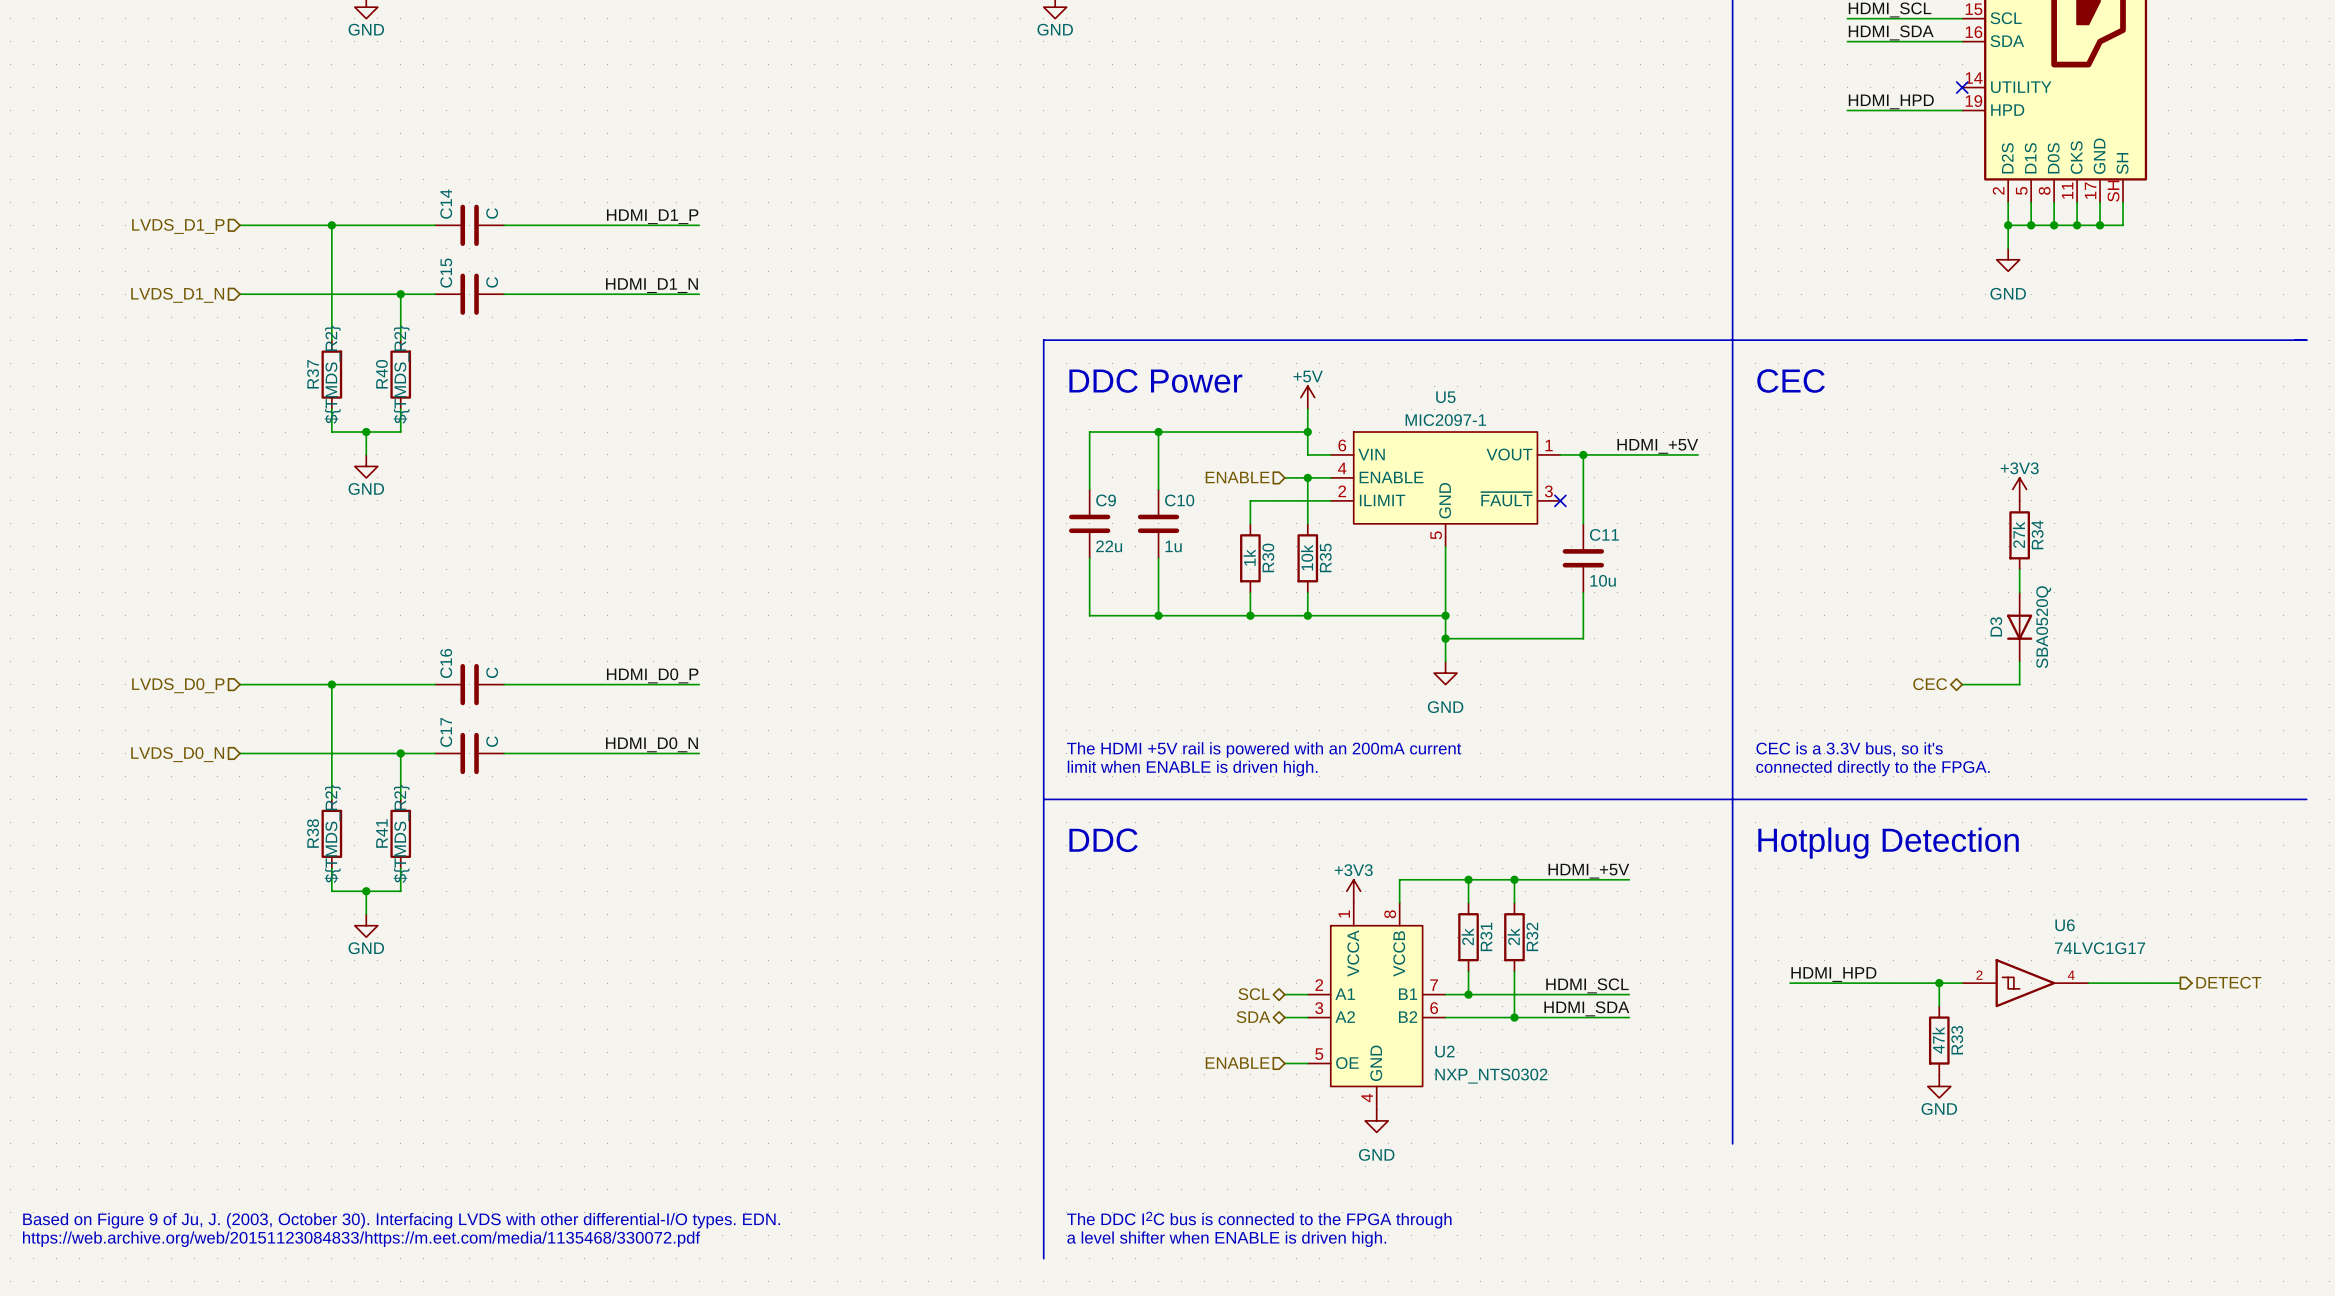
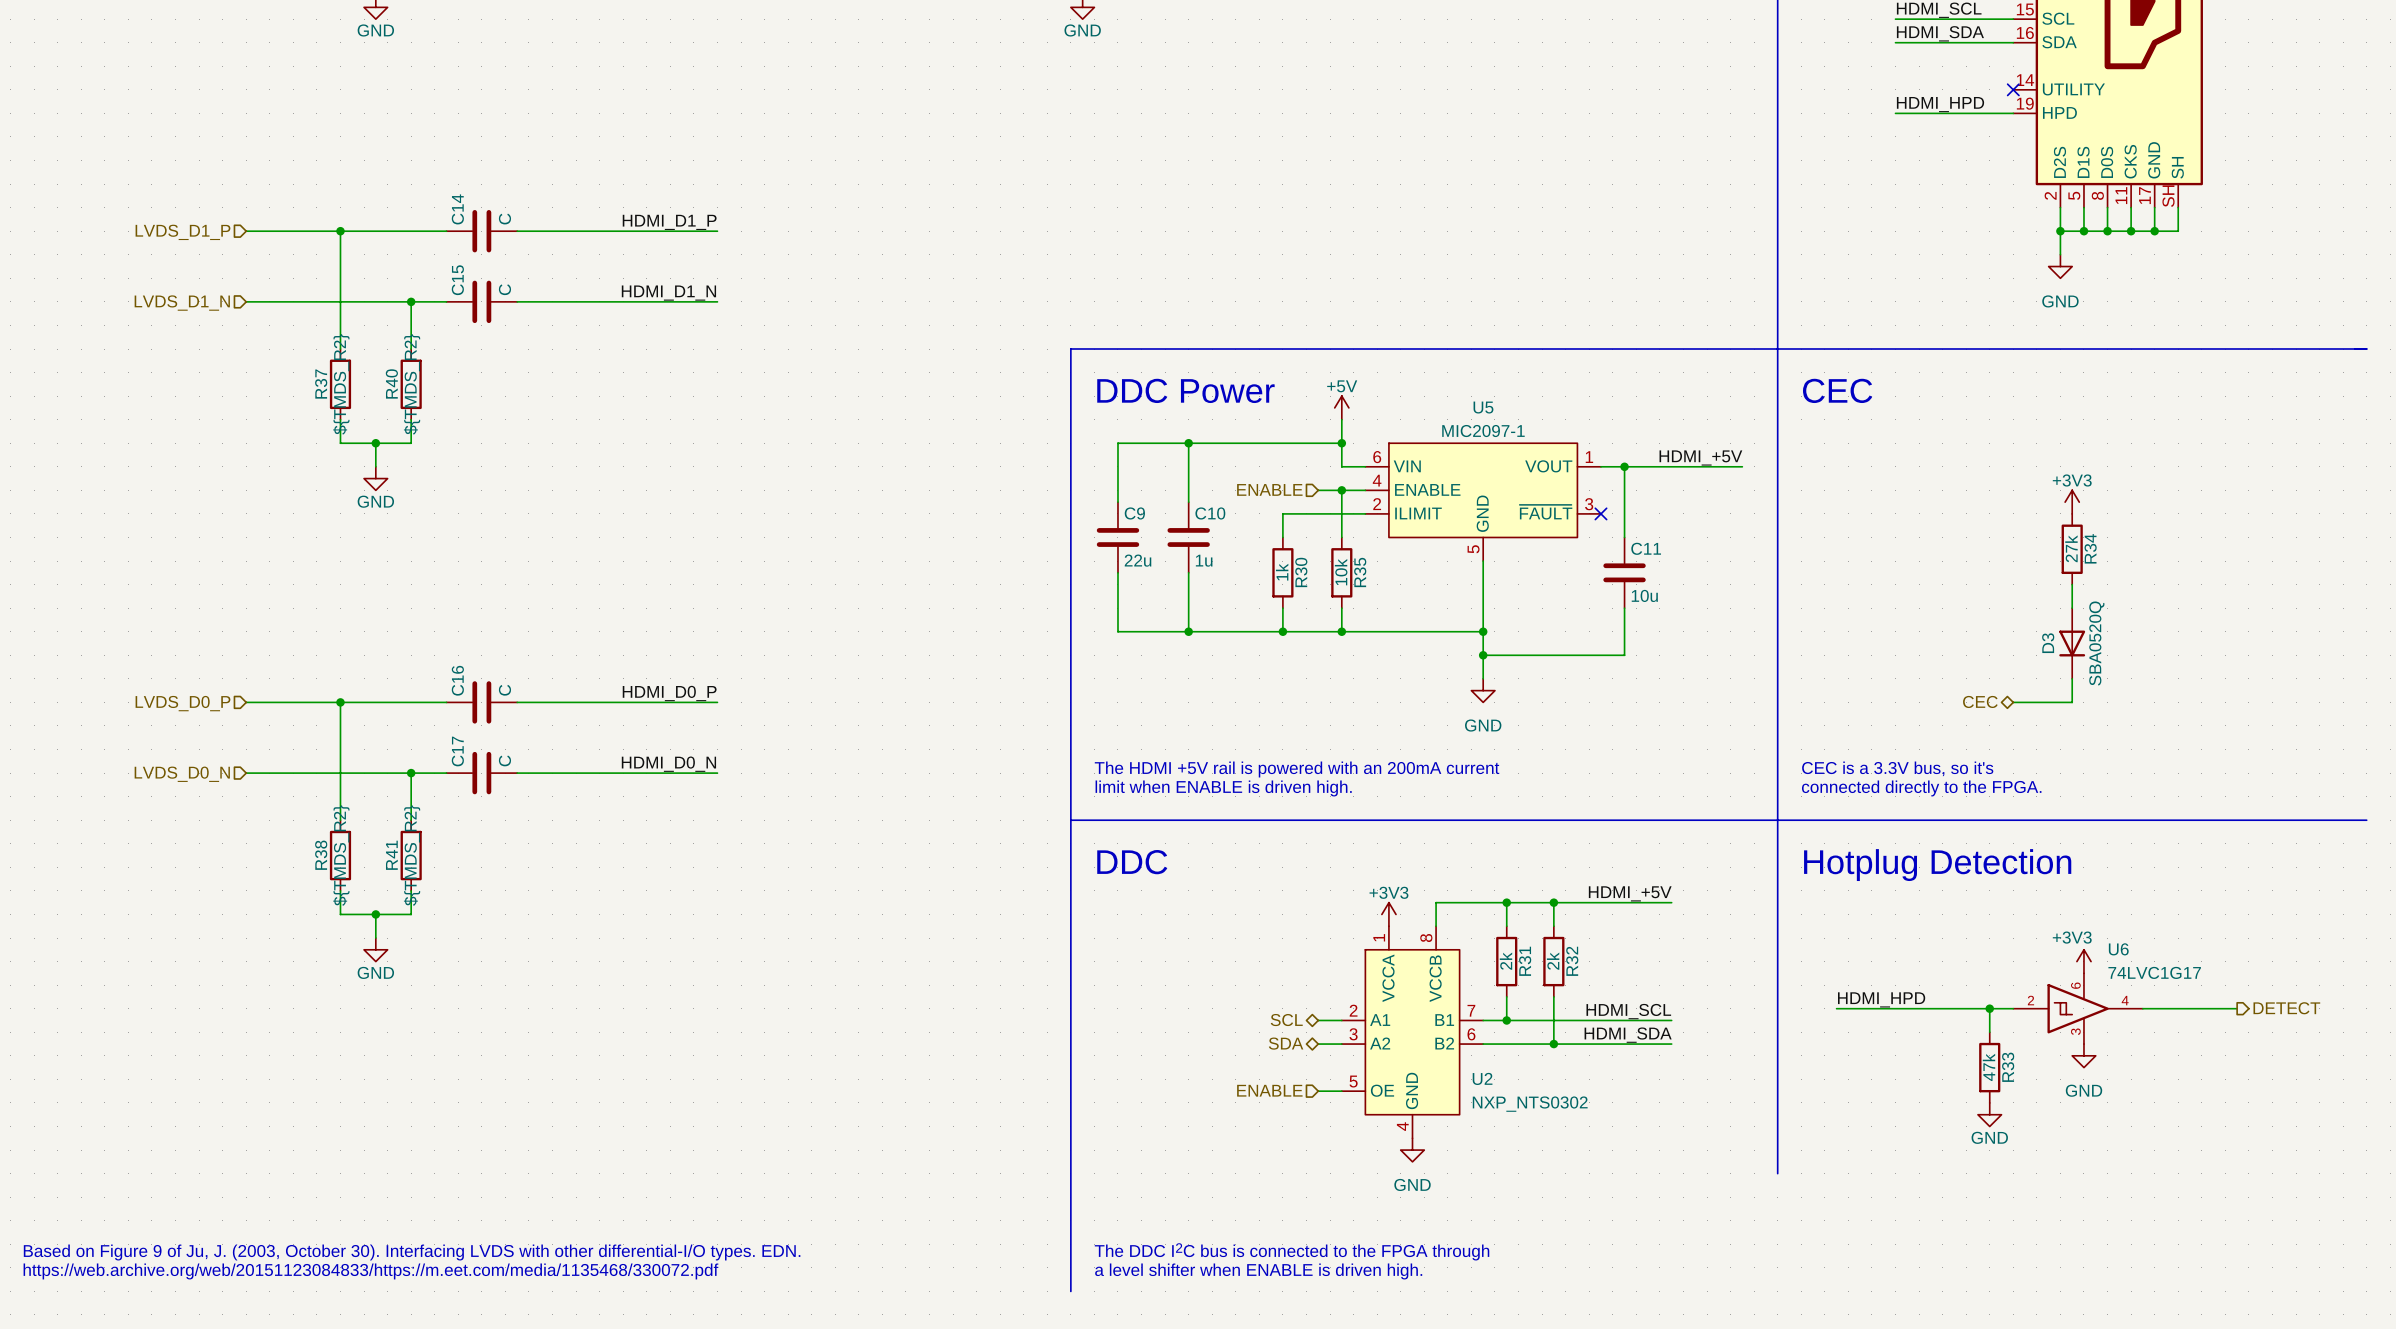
power symbol: none -> +3V3 (2083, 961)
U6 symbol: [1962, 959, 2089, 1008] -> [2013, 973, 2143, 1045]
power symbol: none -> GND (2083, 1055)

